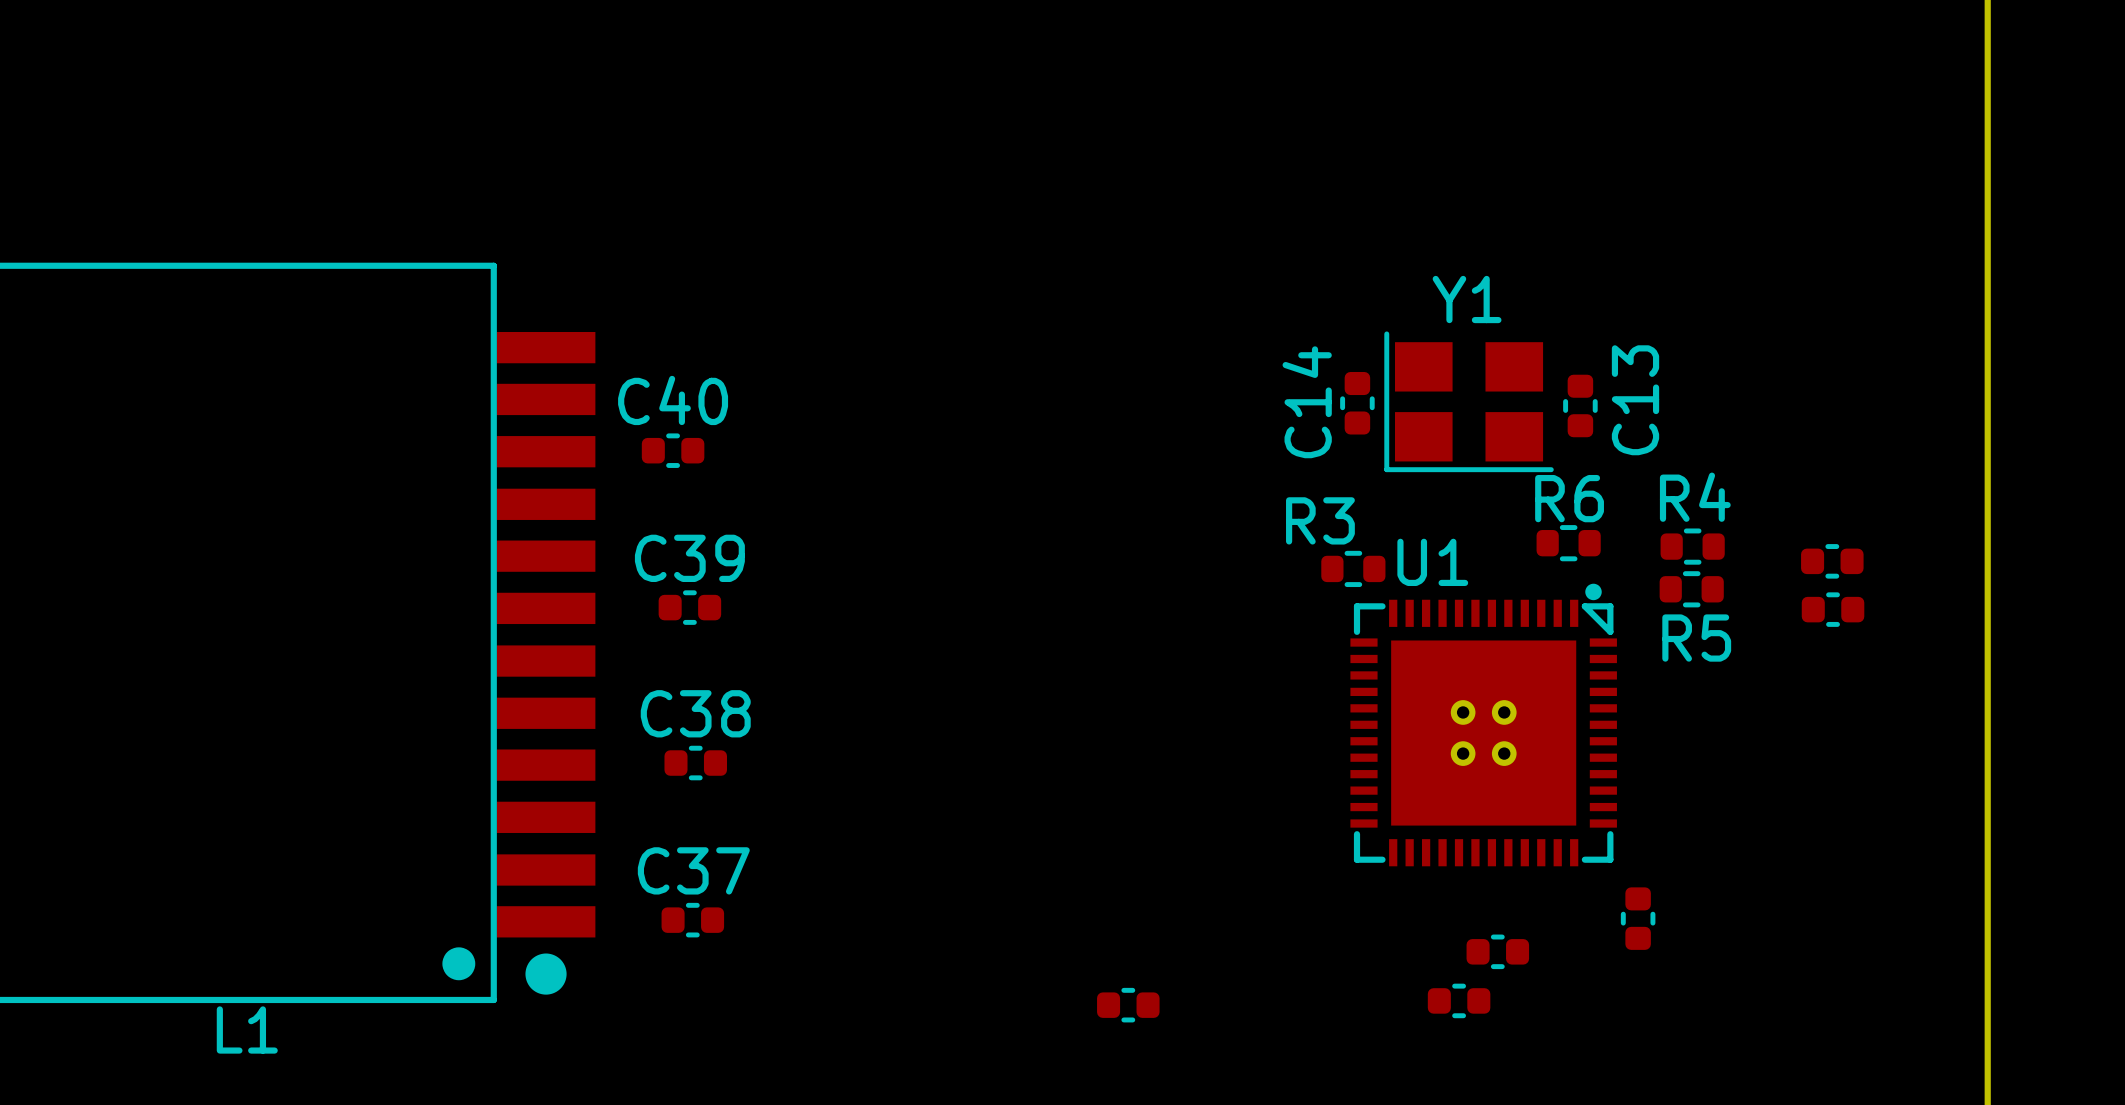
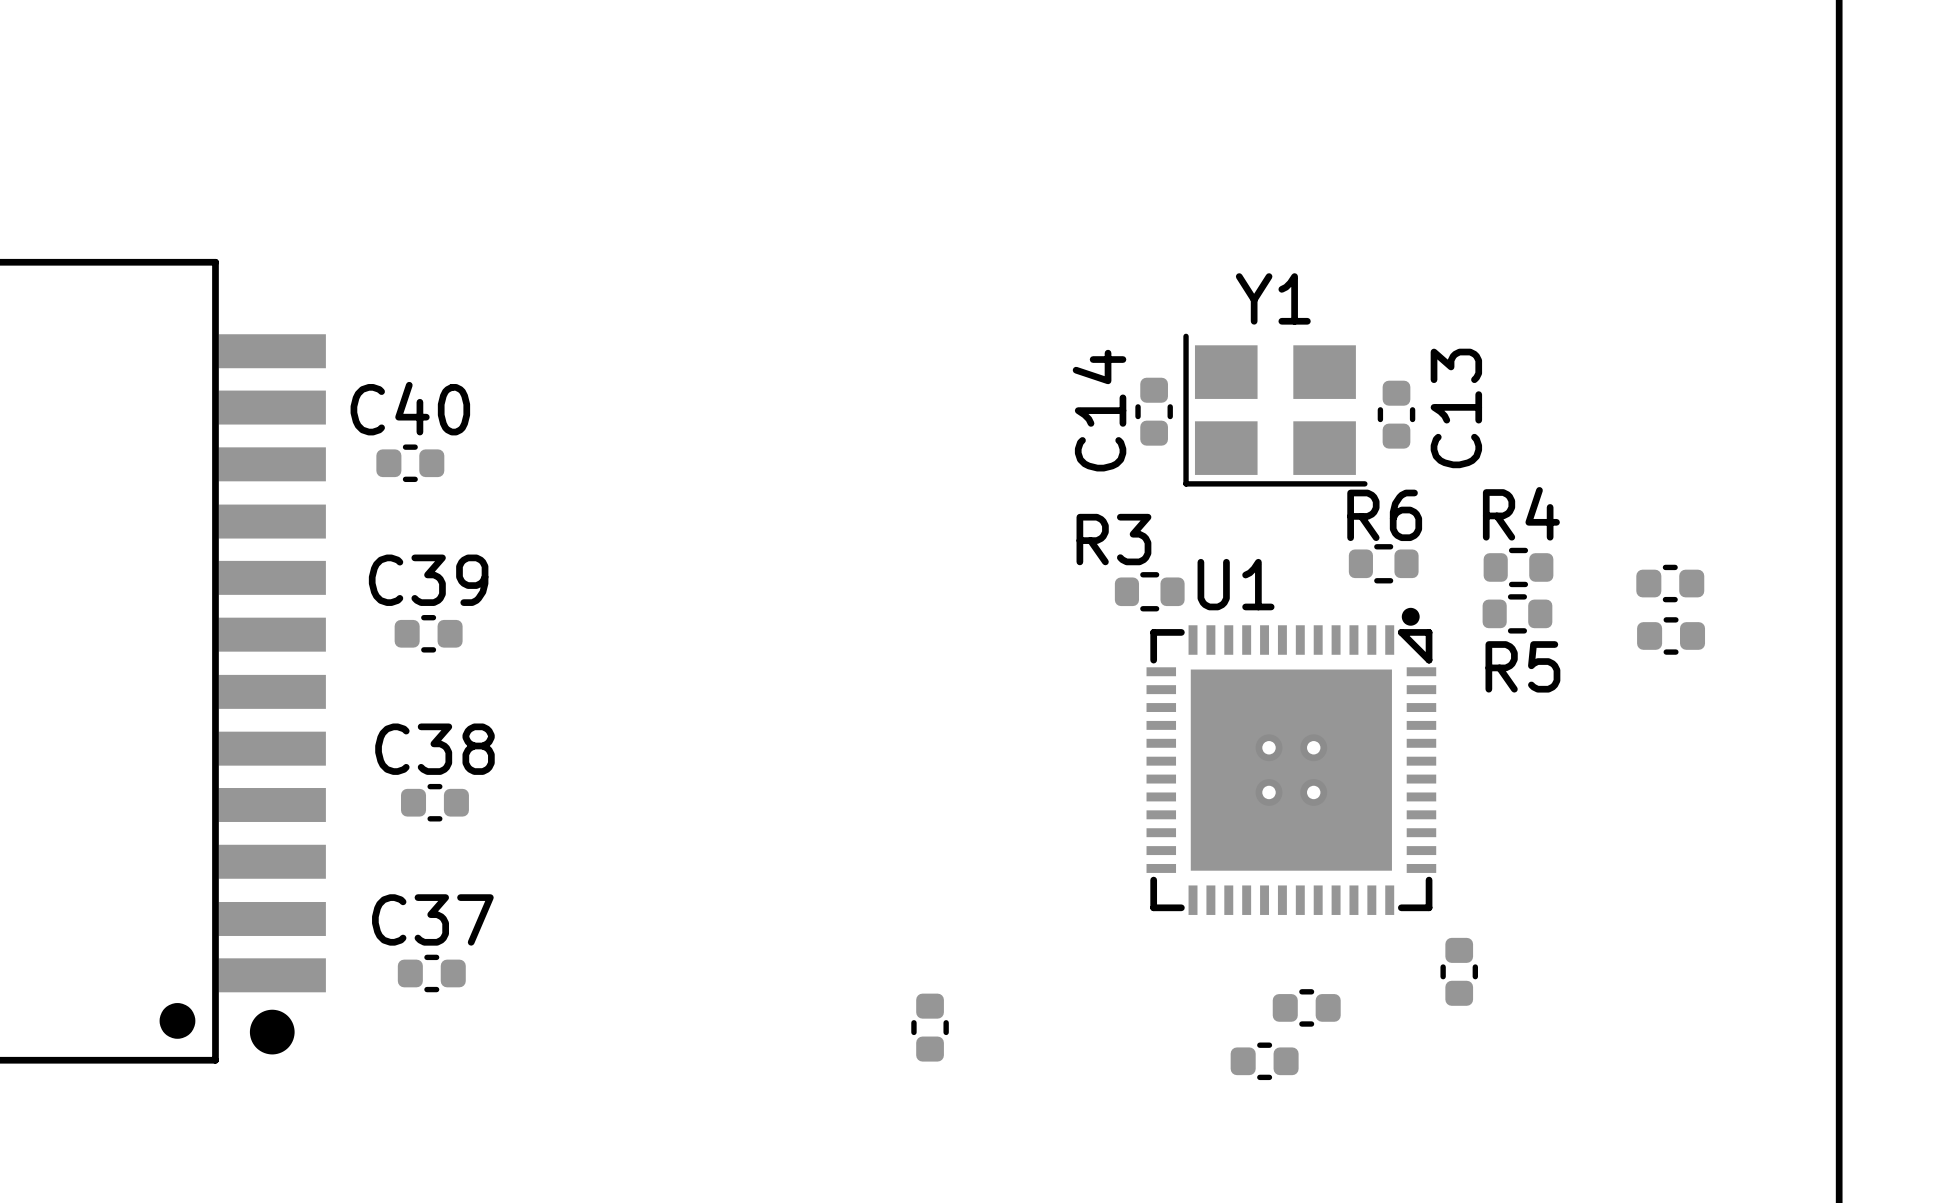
part rotation: 0° (1128, 1005) -> 90° clockwise (930, 1027)
part position: (1128, 1005) -> (930, 1027)

